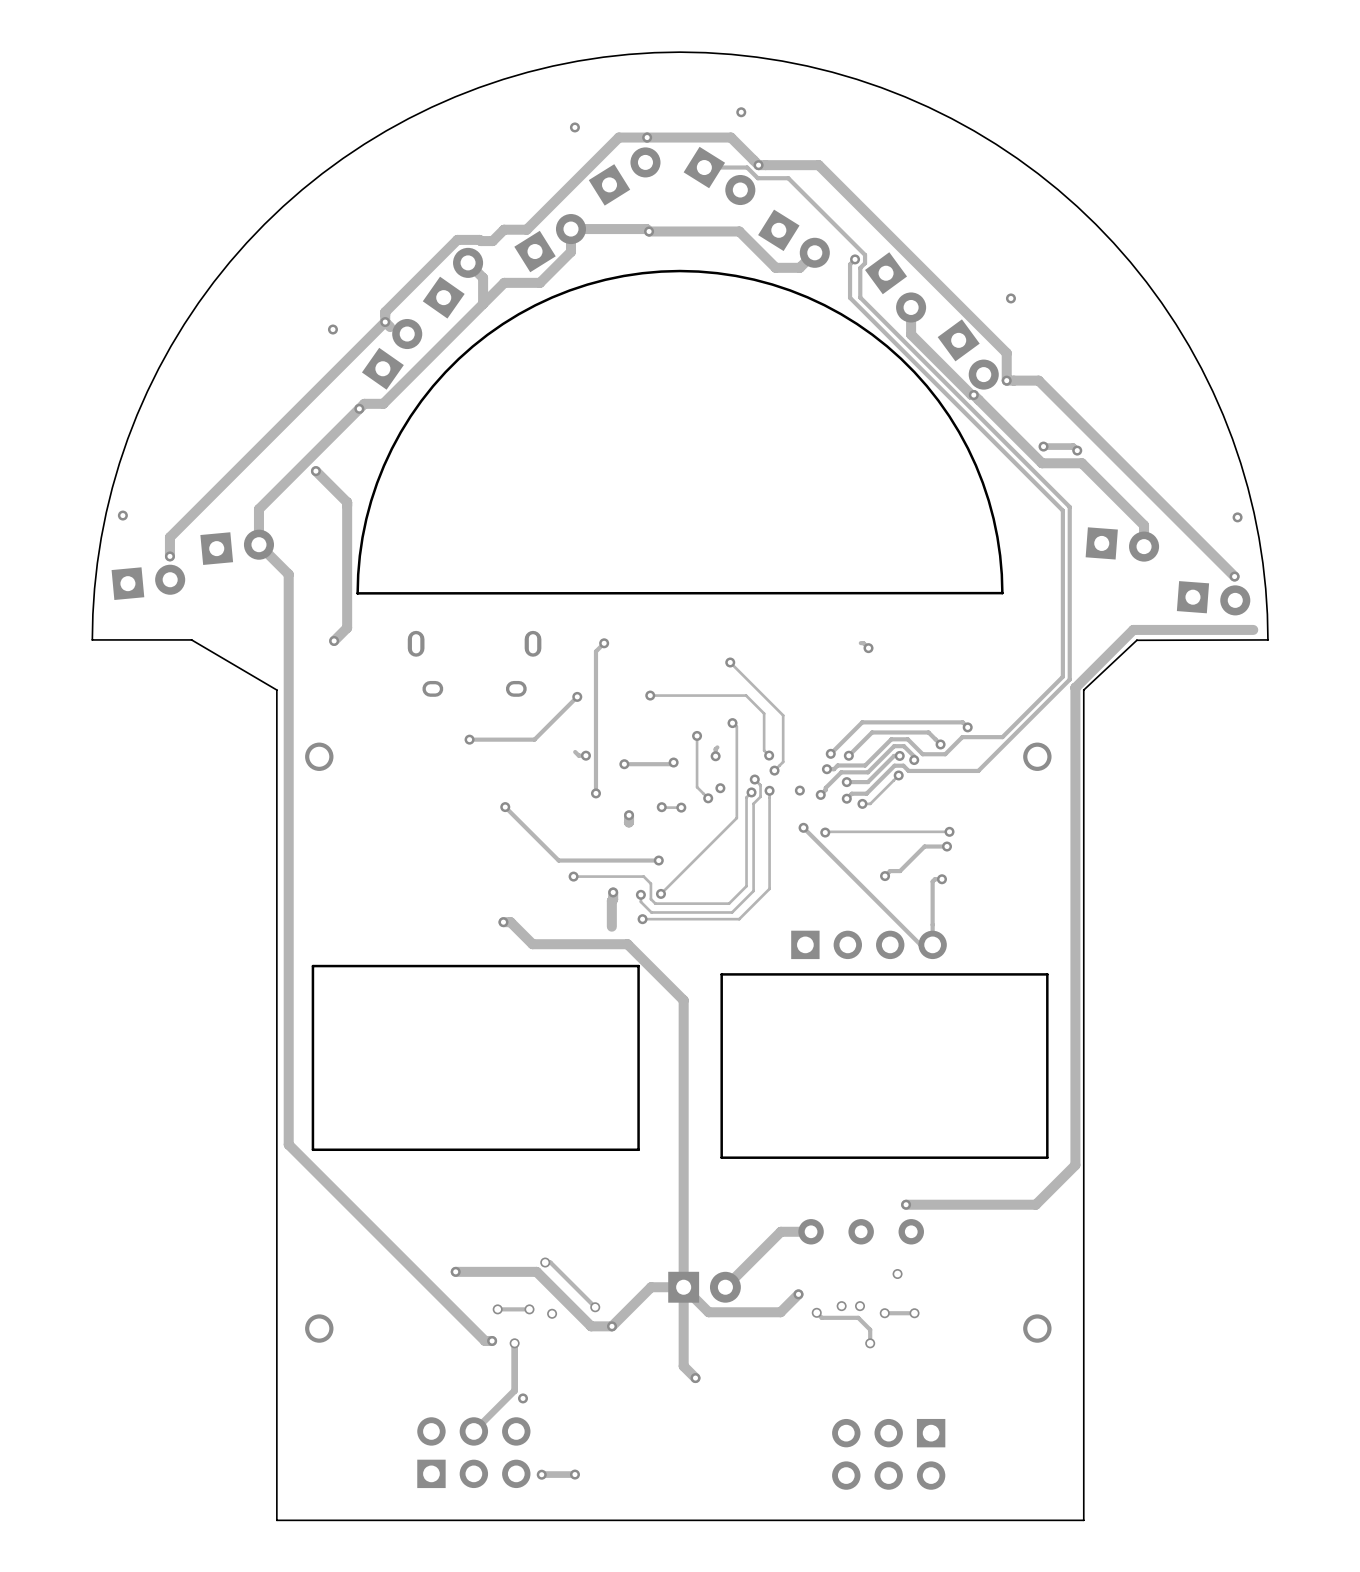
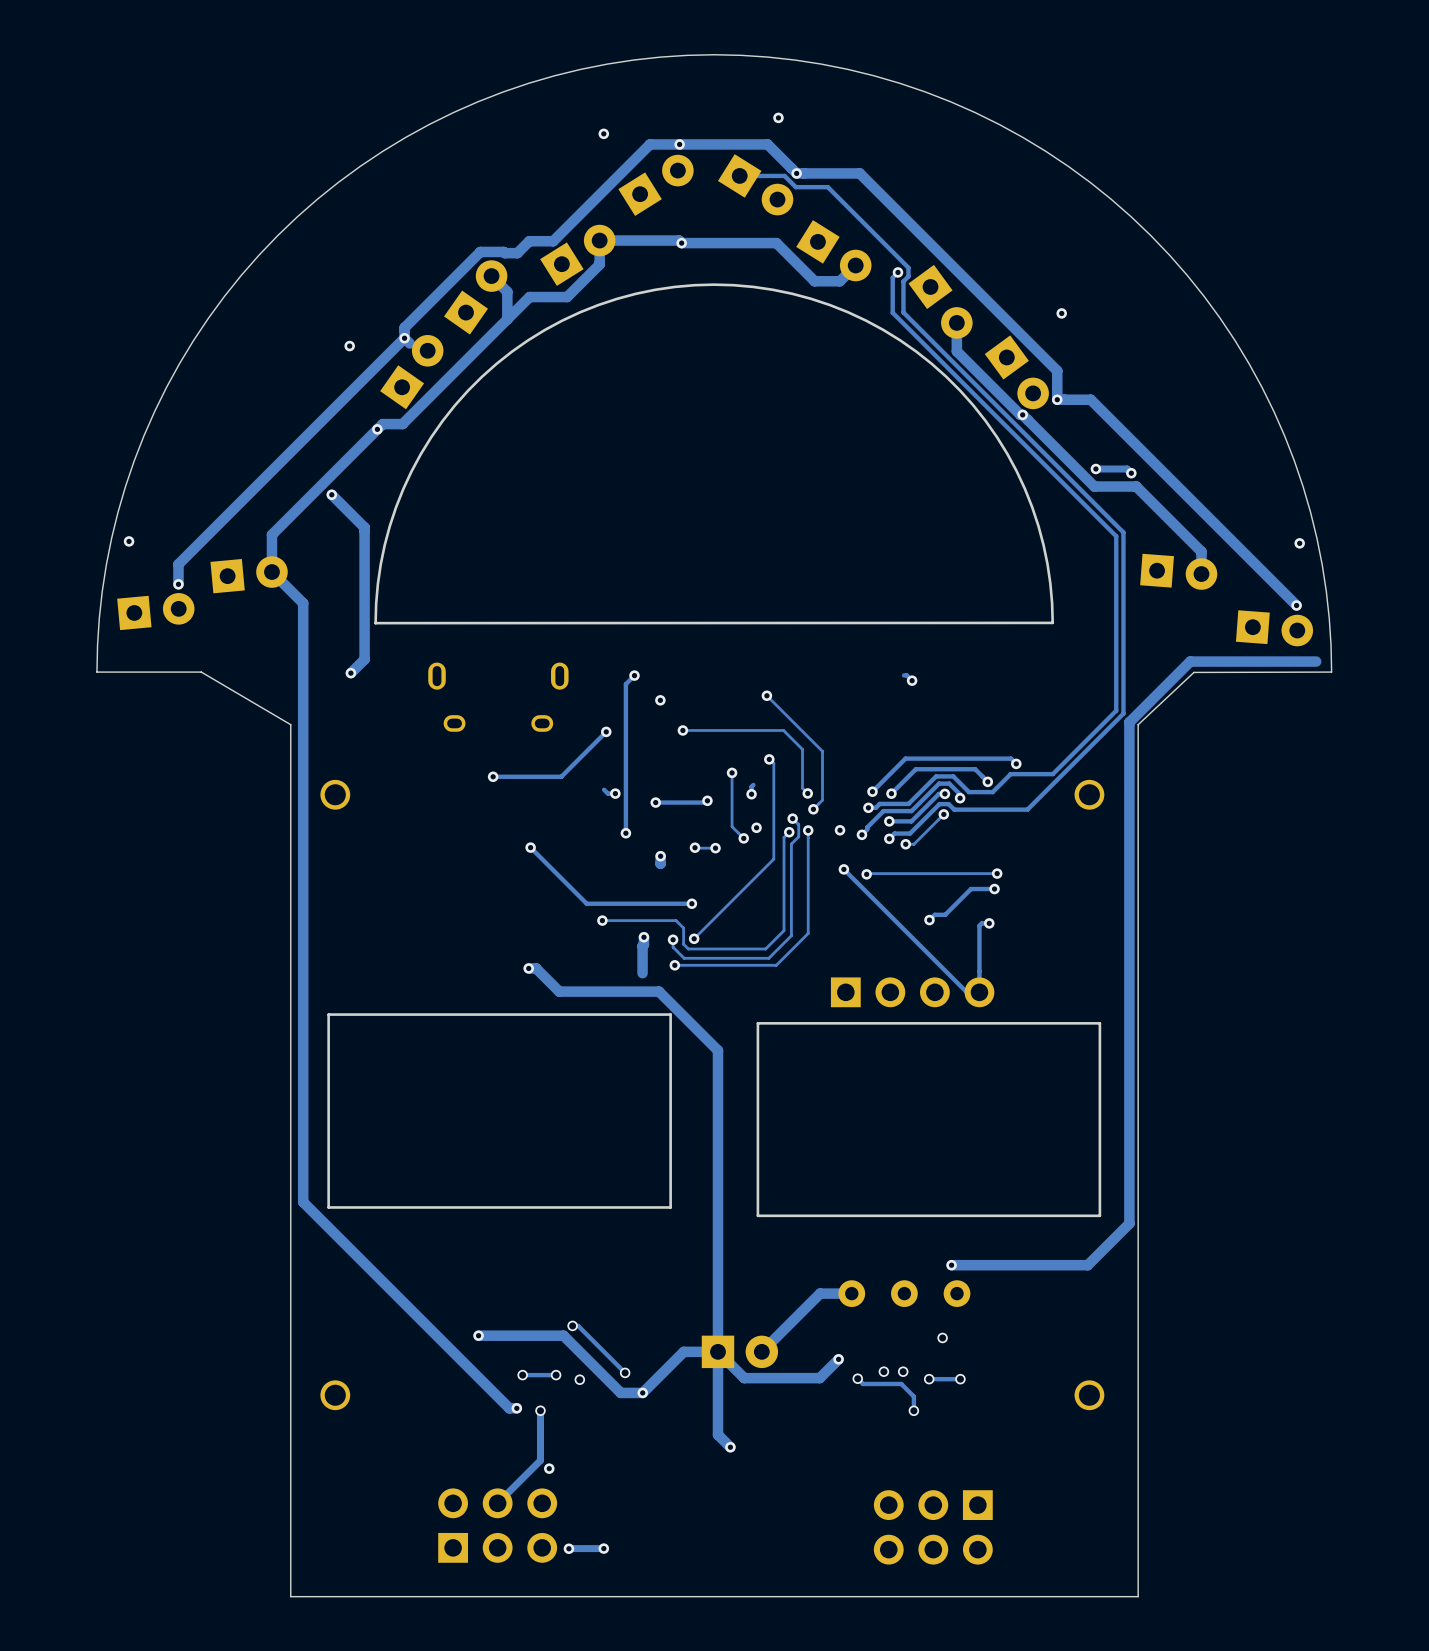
via: none -> (660, 700)

